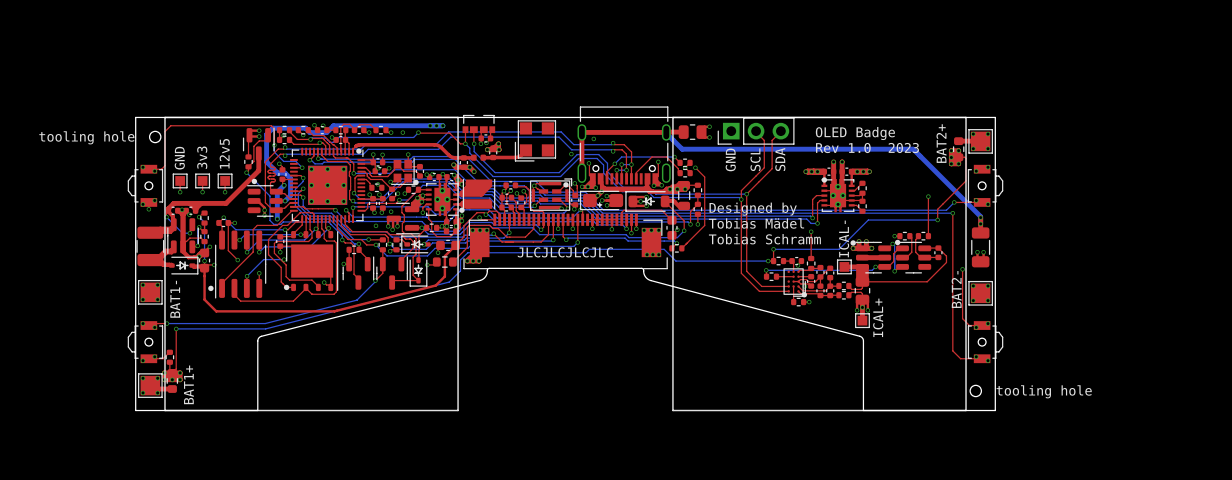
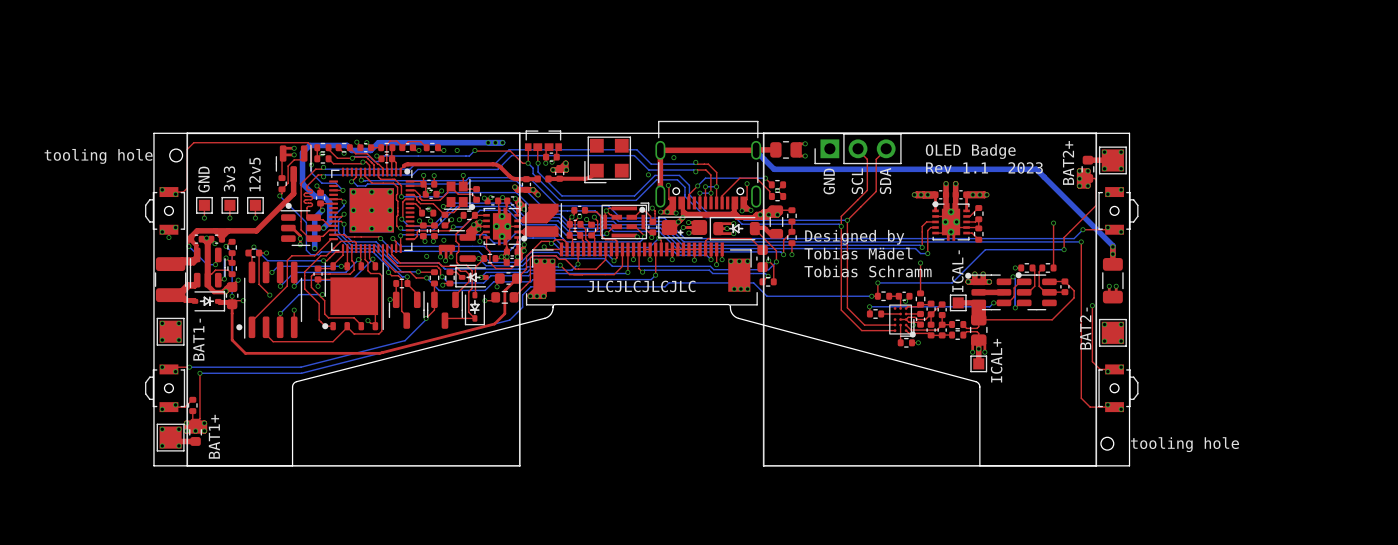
text: Rev 1.0 2023 (867, 148) -> Rev 1.1 2023 (984, 167)
top track: (695, 167) (704, 177) (704, 225) (681, 248) -> (768, 260) (773, 265) (773, 281)
via: (695, 167) -> none

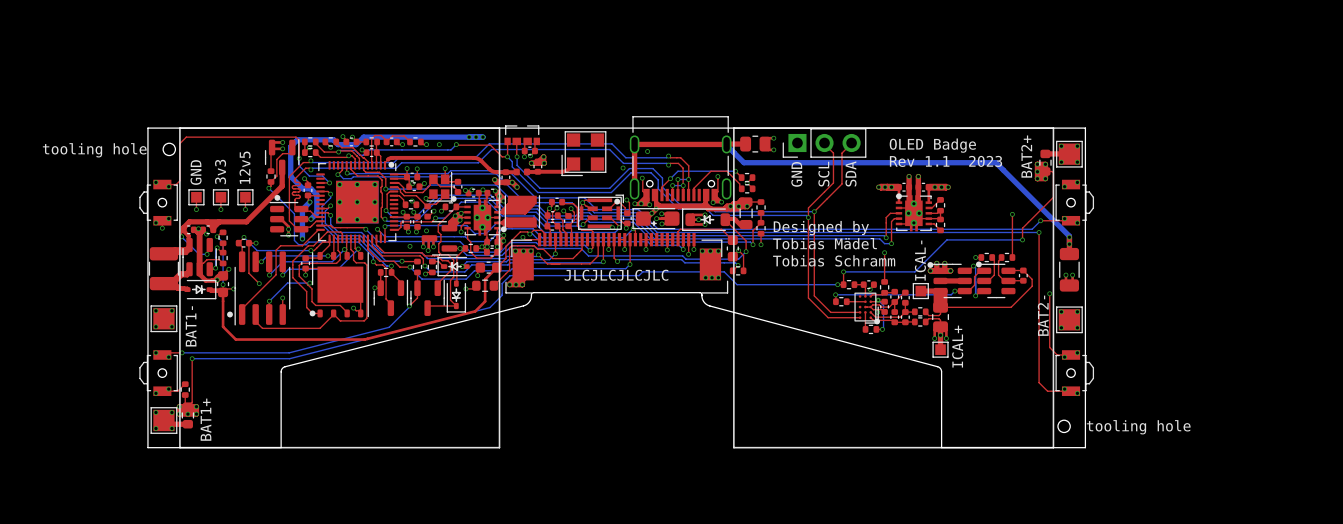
bottom track: none -> (878, 300) (883, 305) (882, 329)
via: none -> (878, 300)

